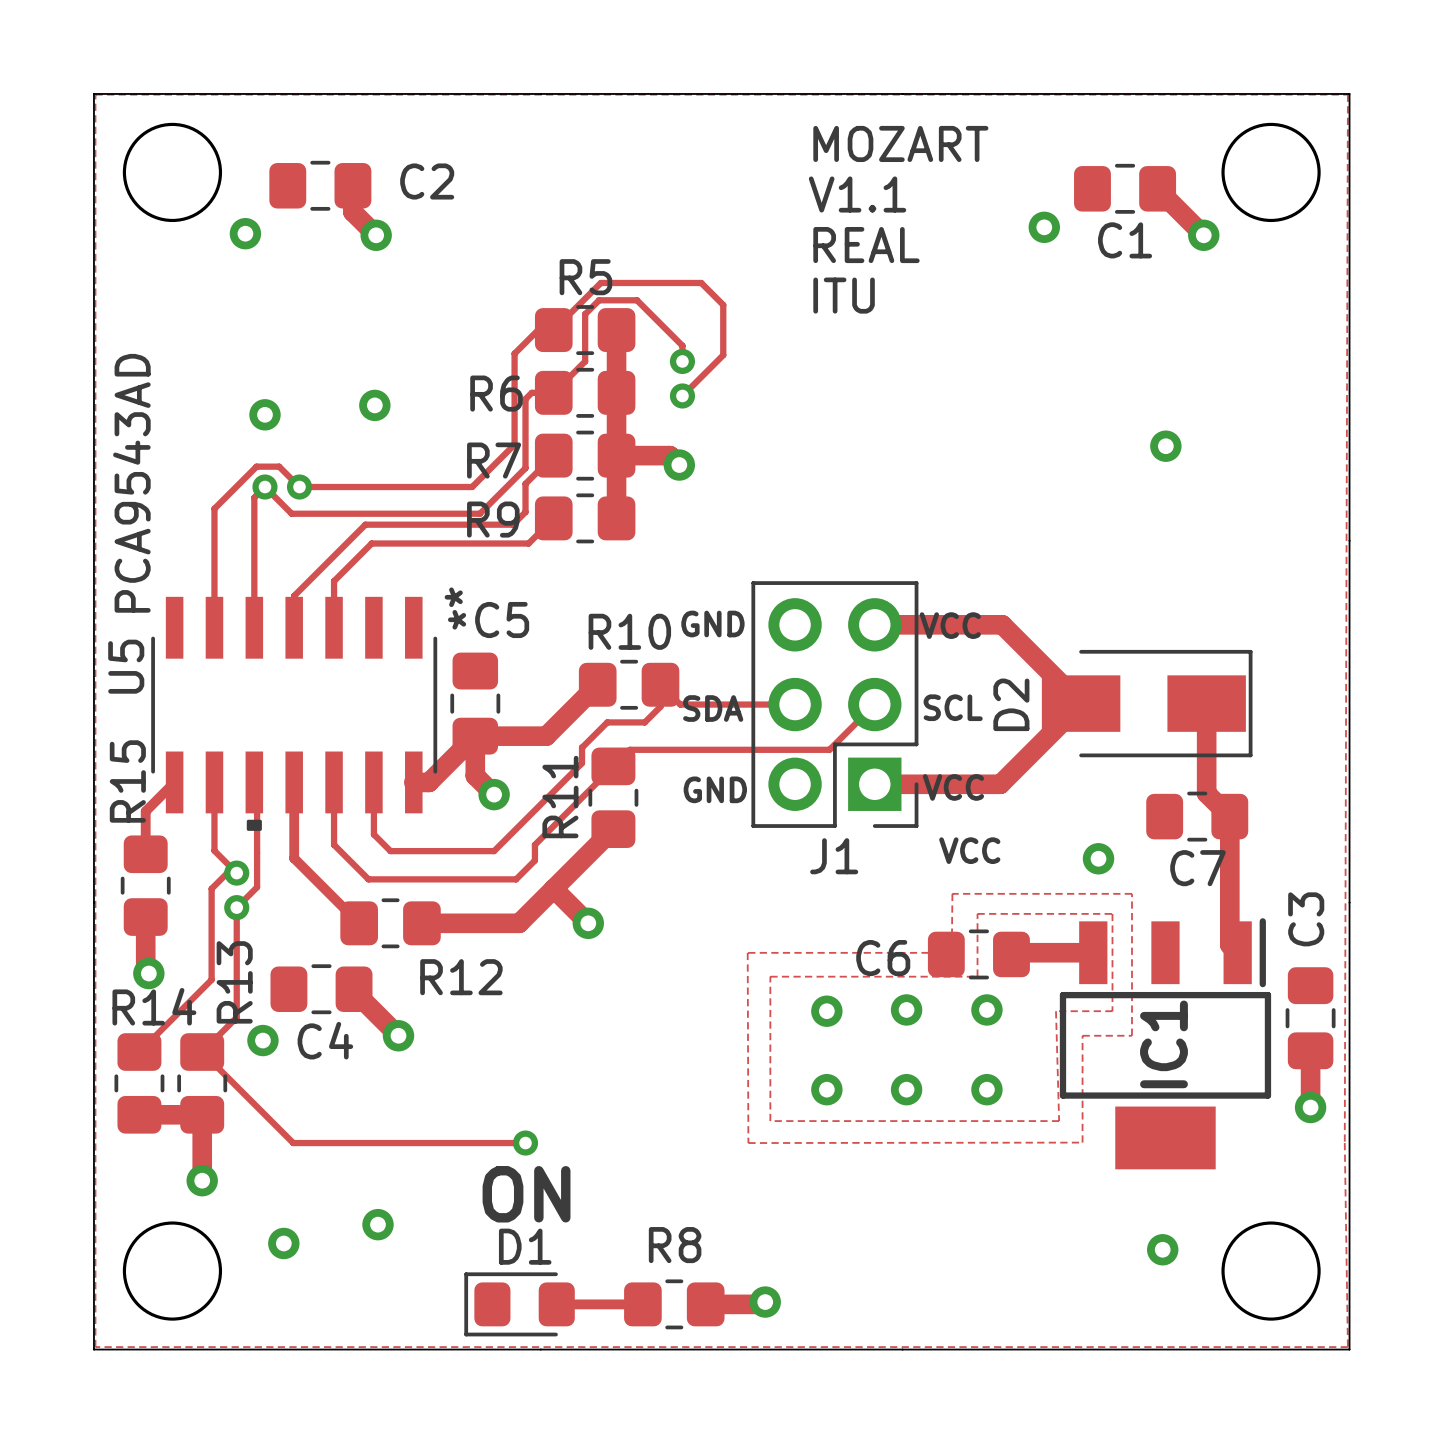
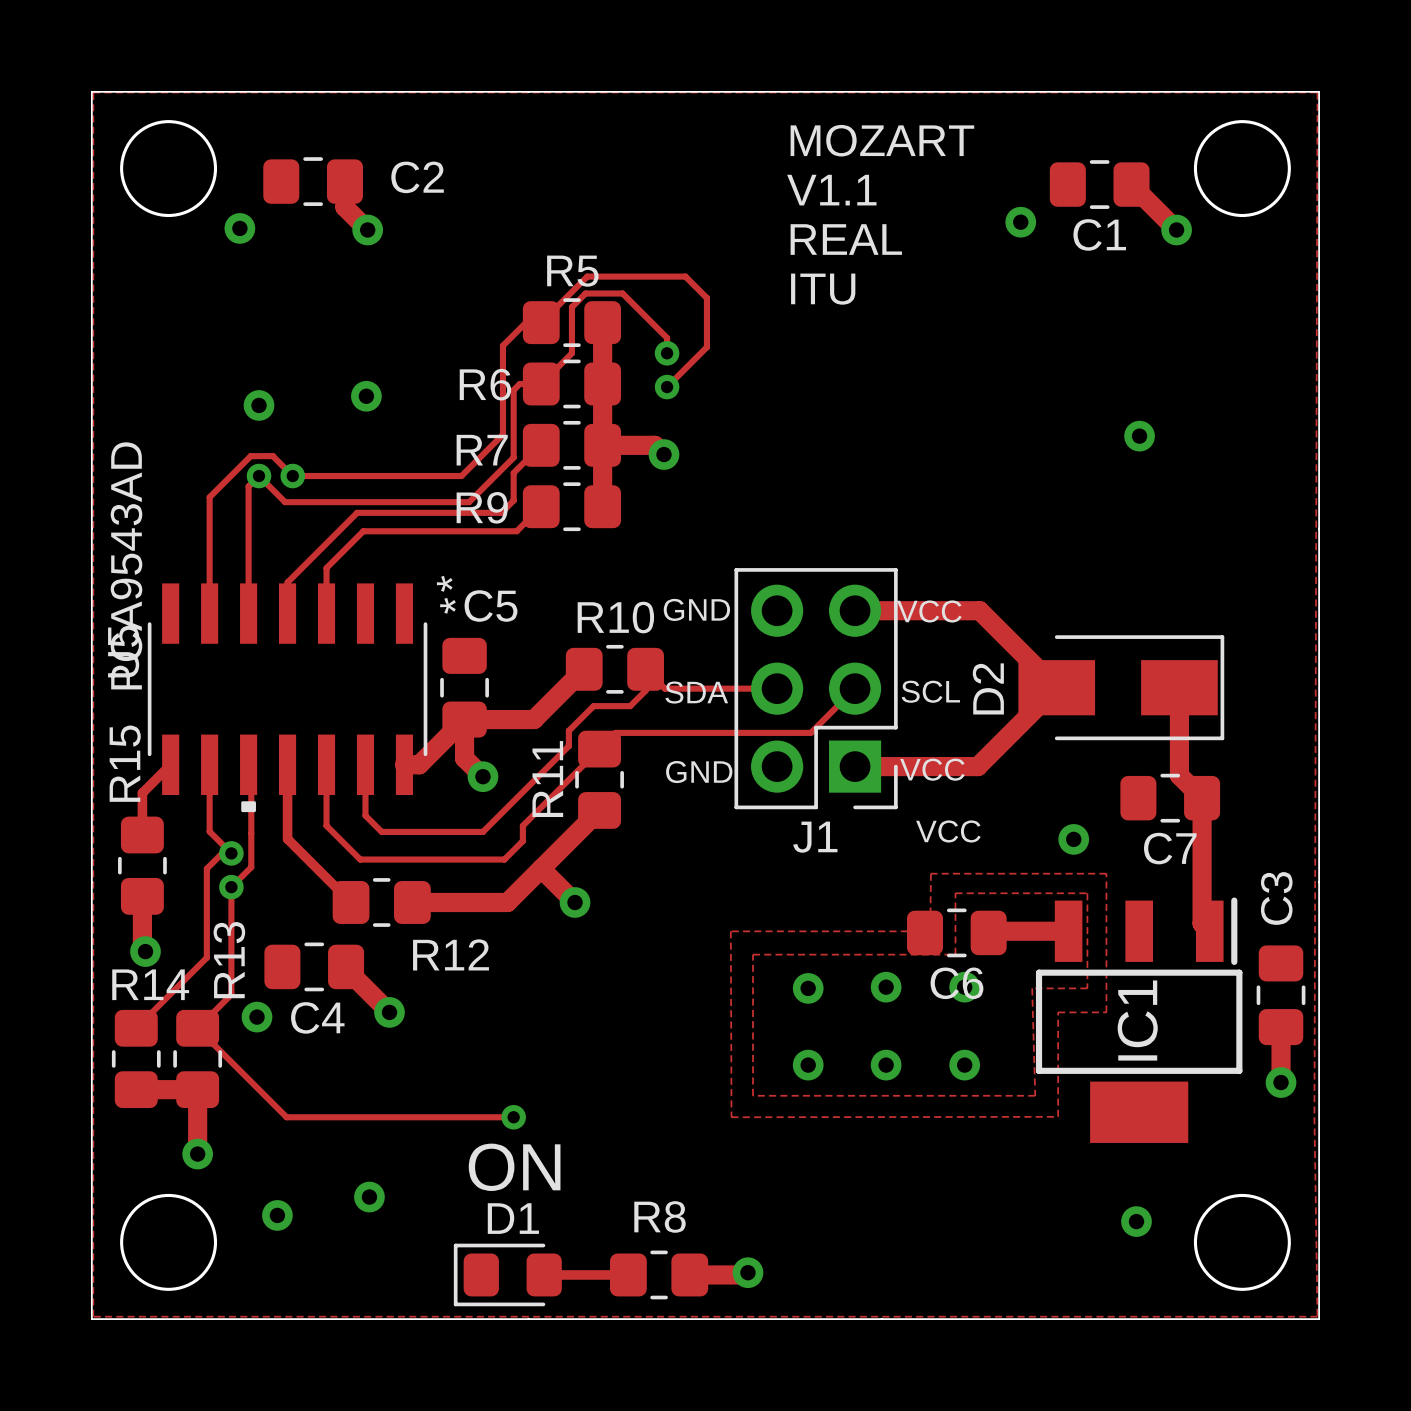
U5 value position: PCA9543AD (131, 483) -> PCA9543AD (126, 565)
C6 name position: C6 (883, 958) -> C6 (956, 983)

